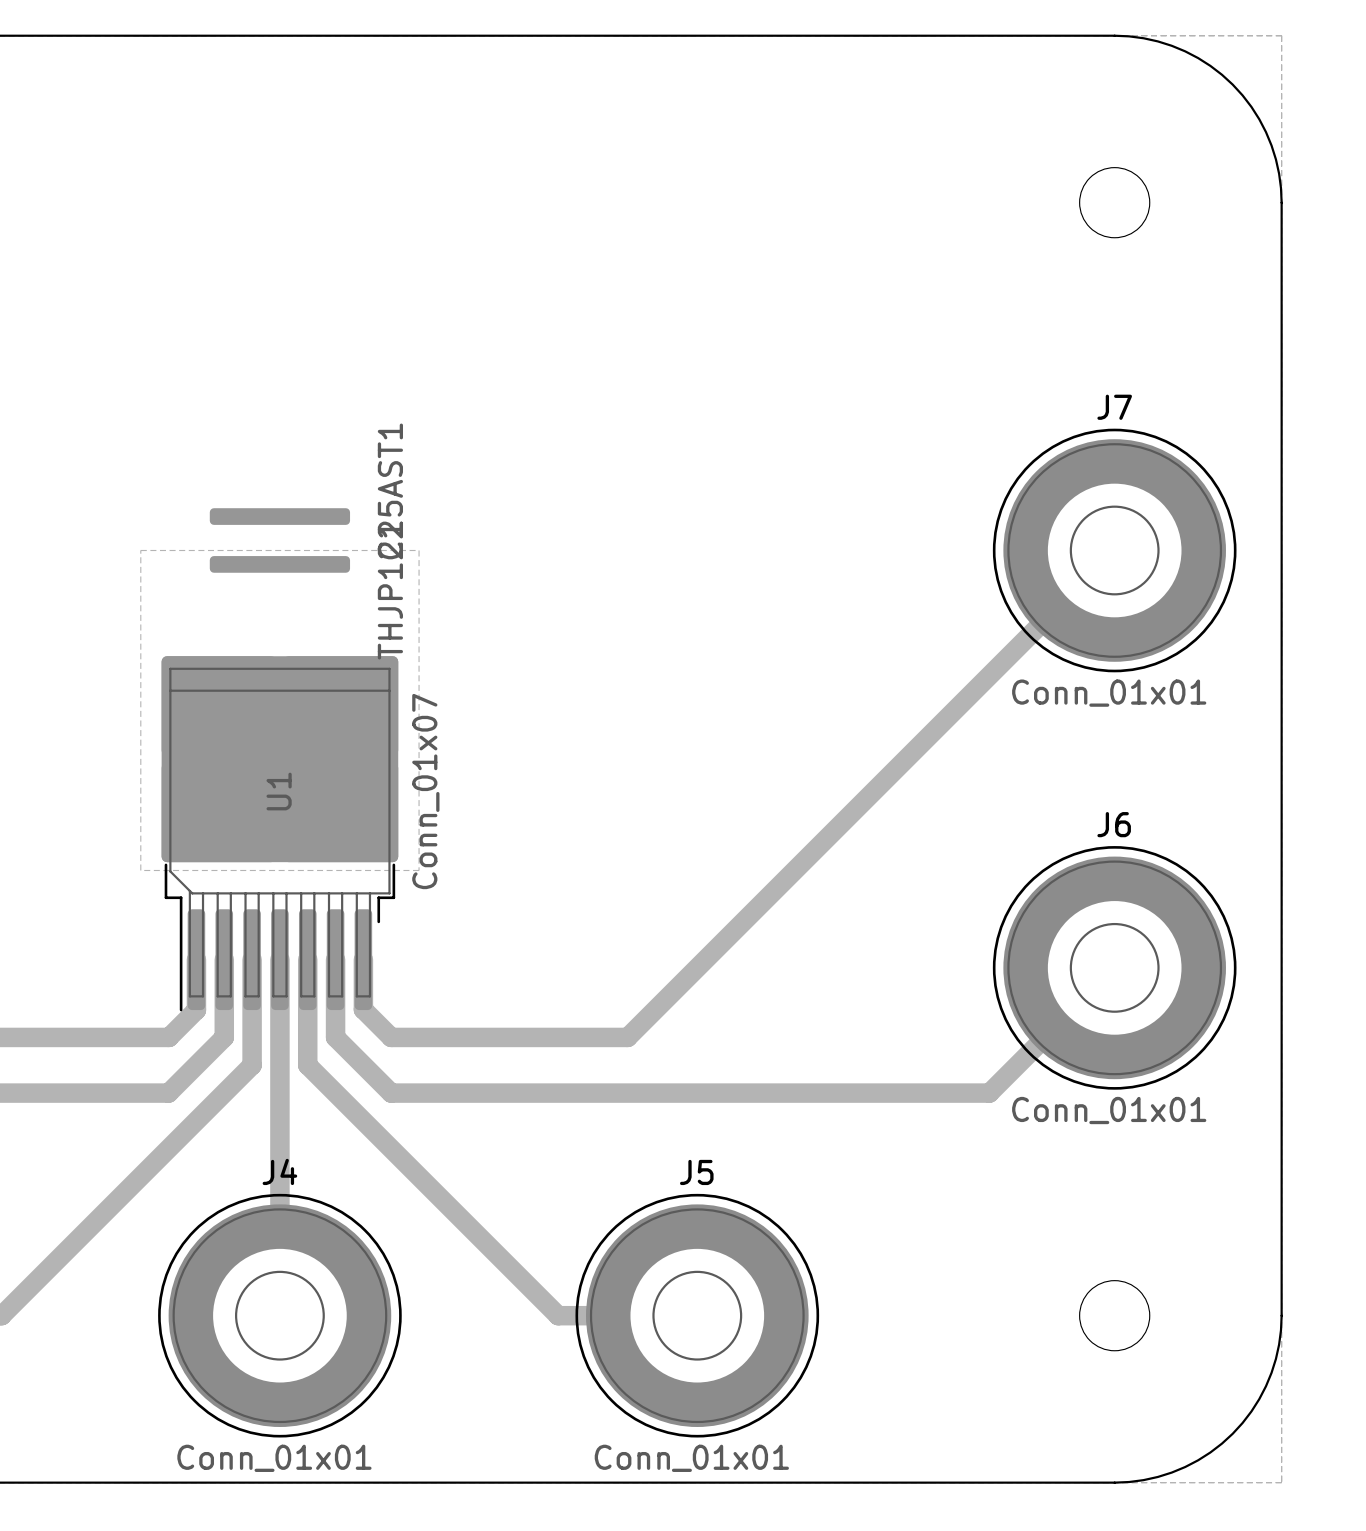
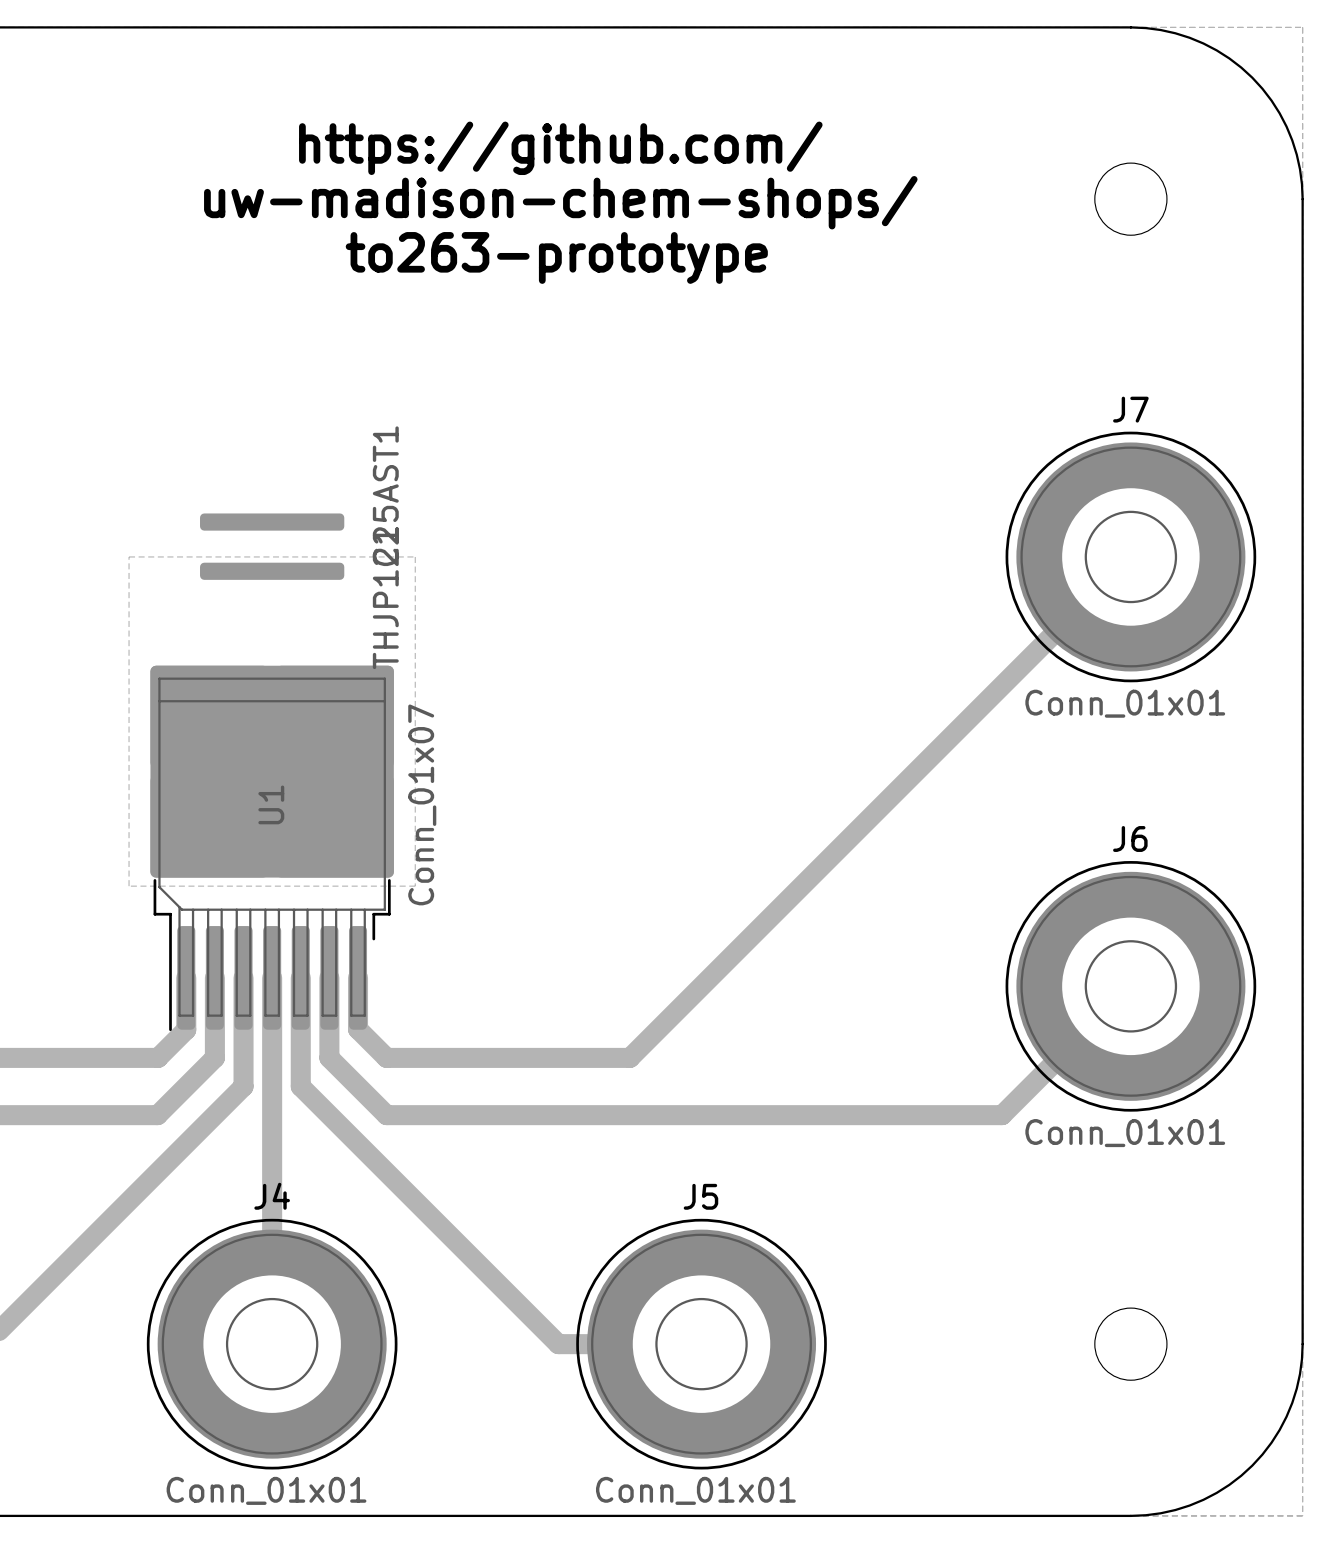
text: none -> https://github.com/ (560, 148)
text: none -> uw-madison-chem-shops/ (560, 202)
text: none -> to263-prototype (556, 257)

